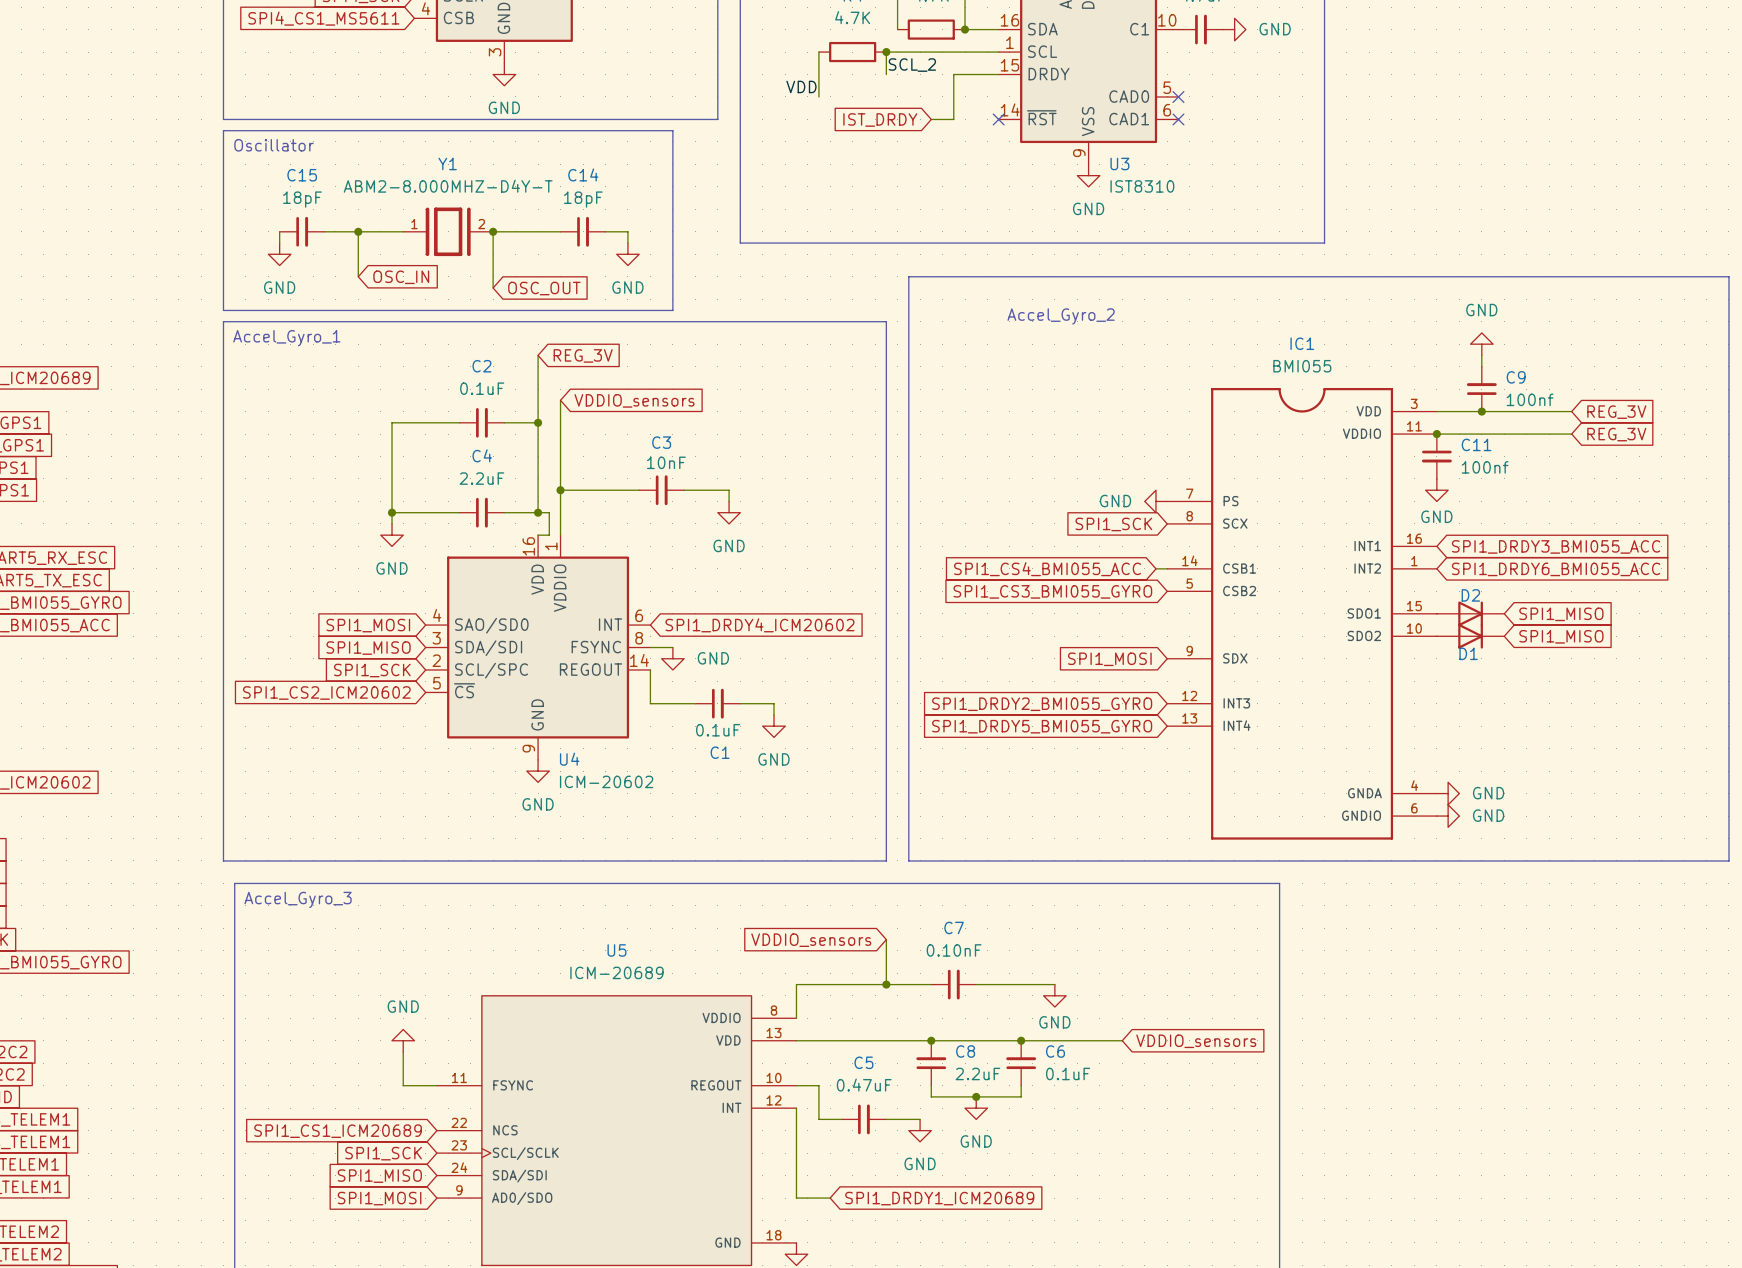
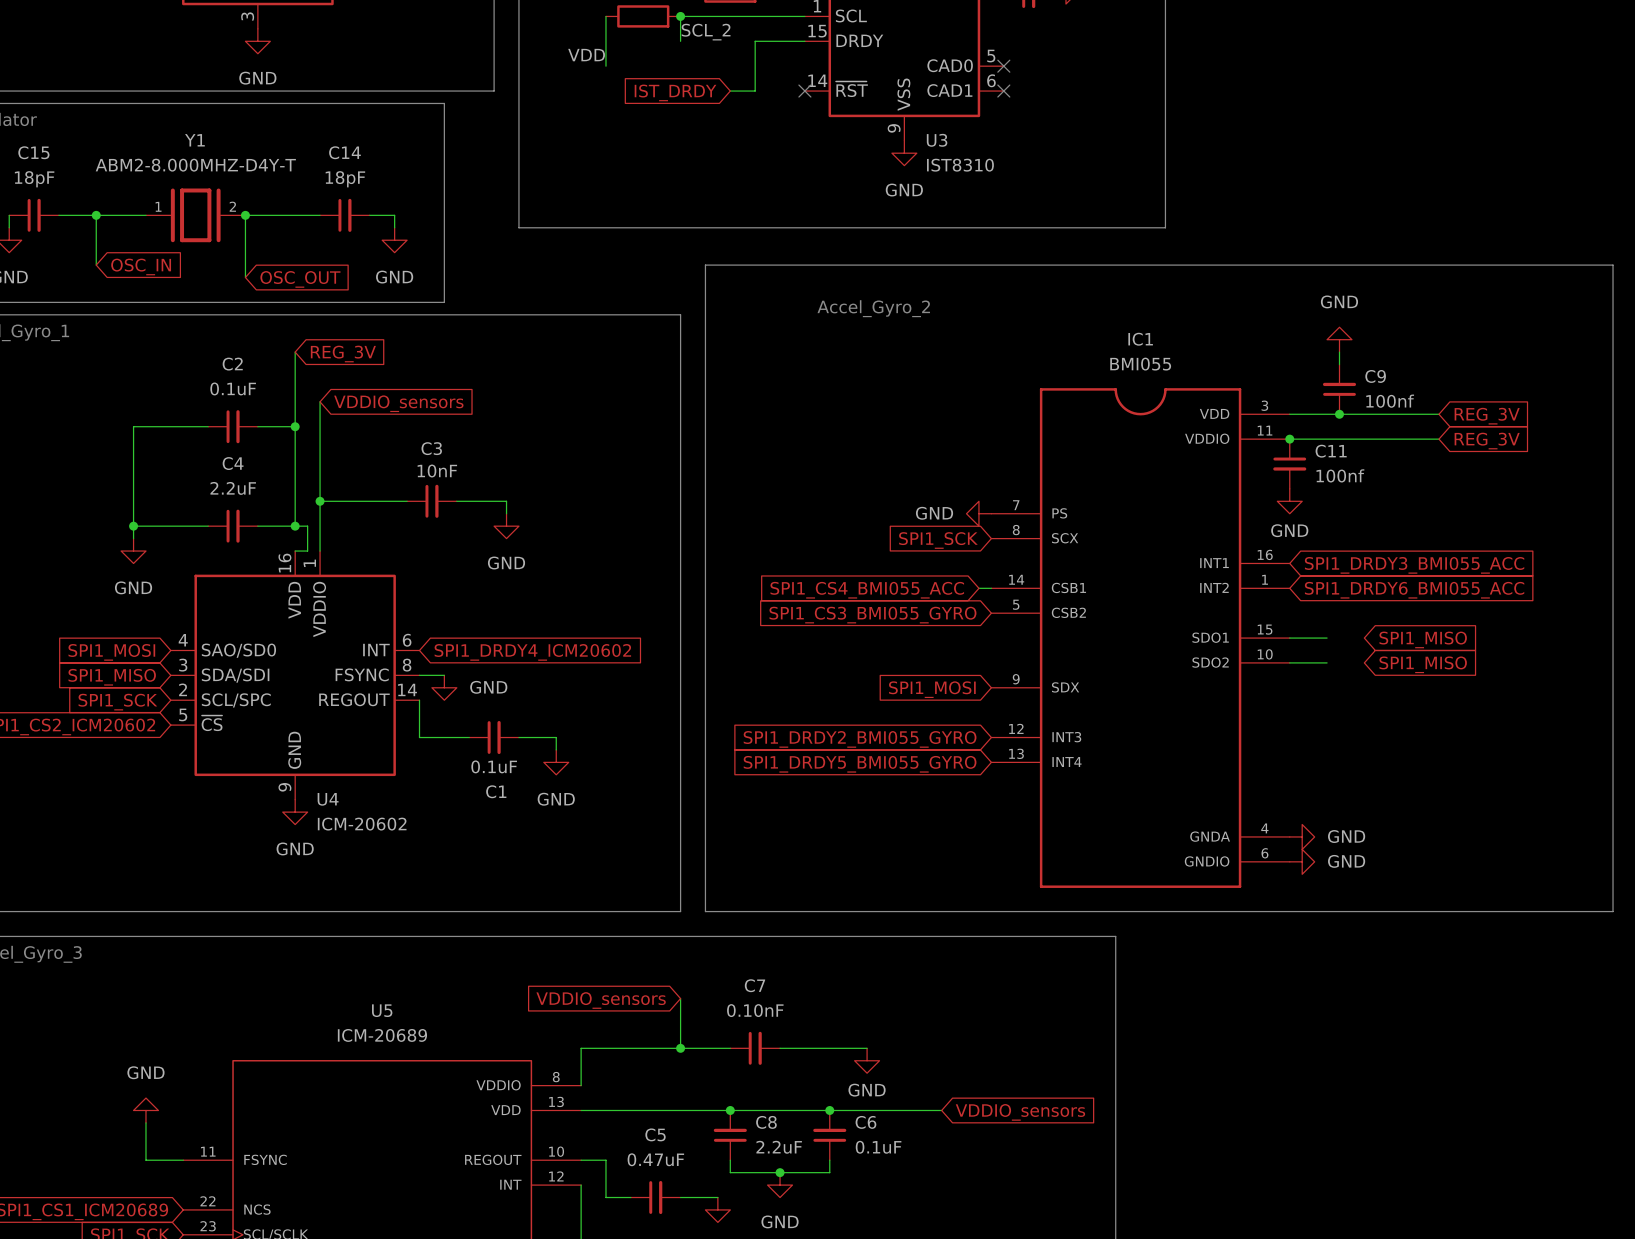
D2: (1470, 613) -> none
D1: (1470, 636) -> none

